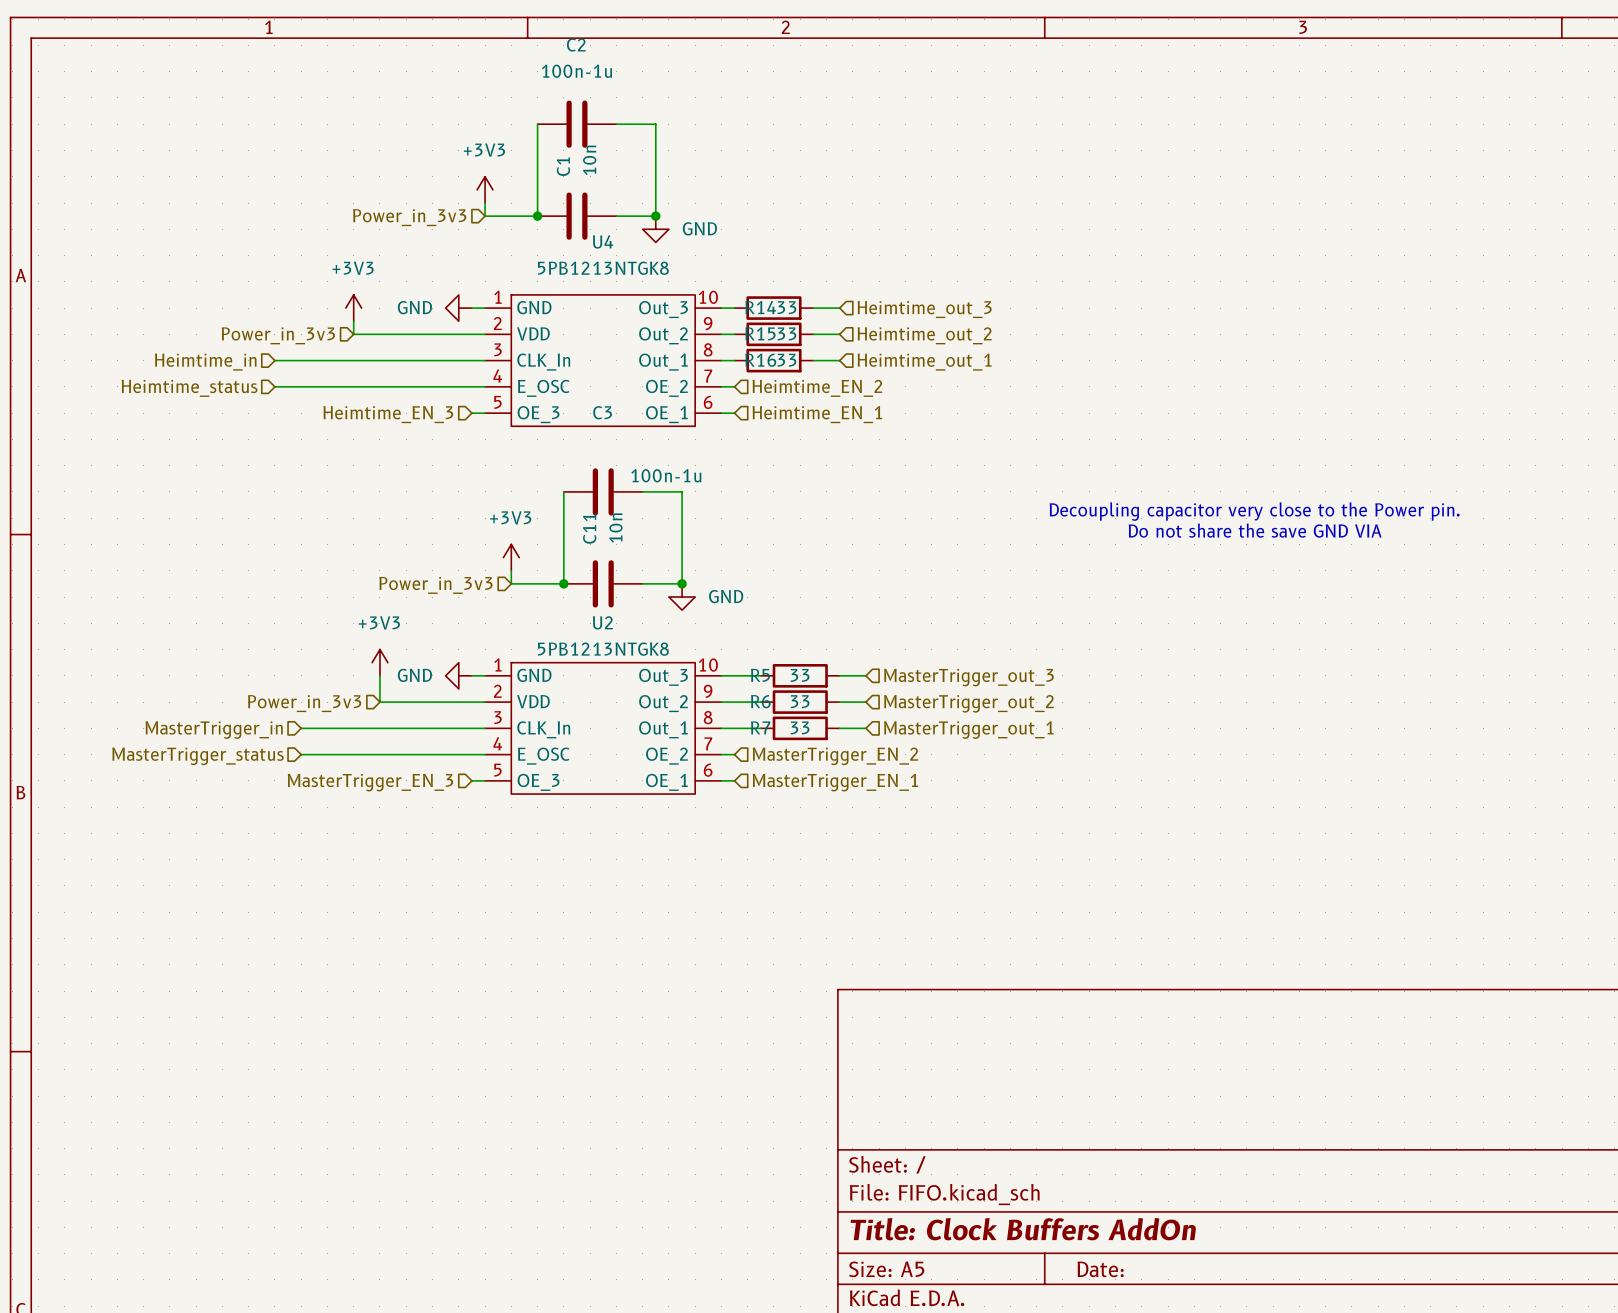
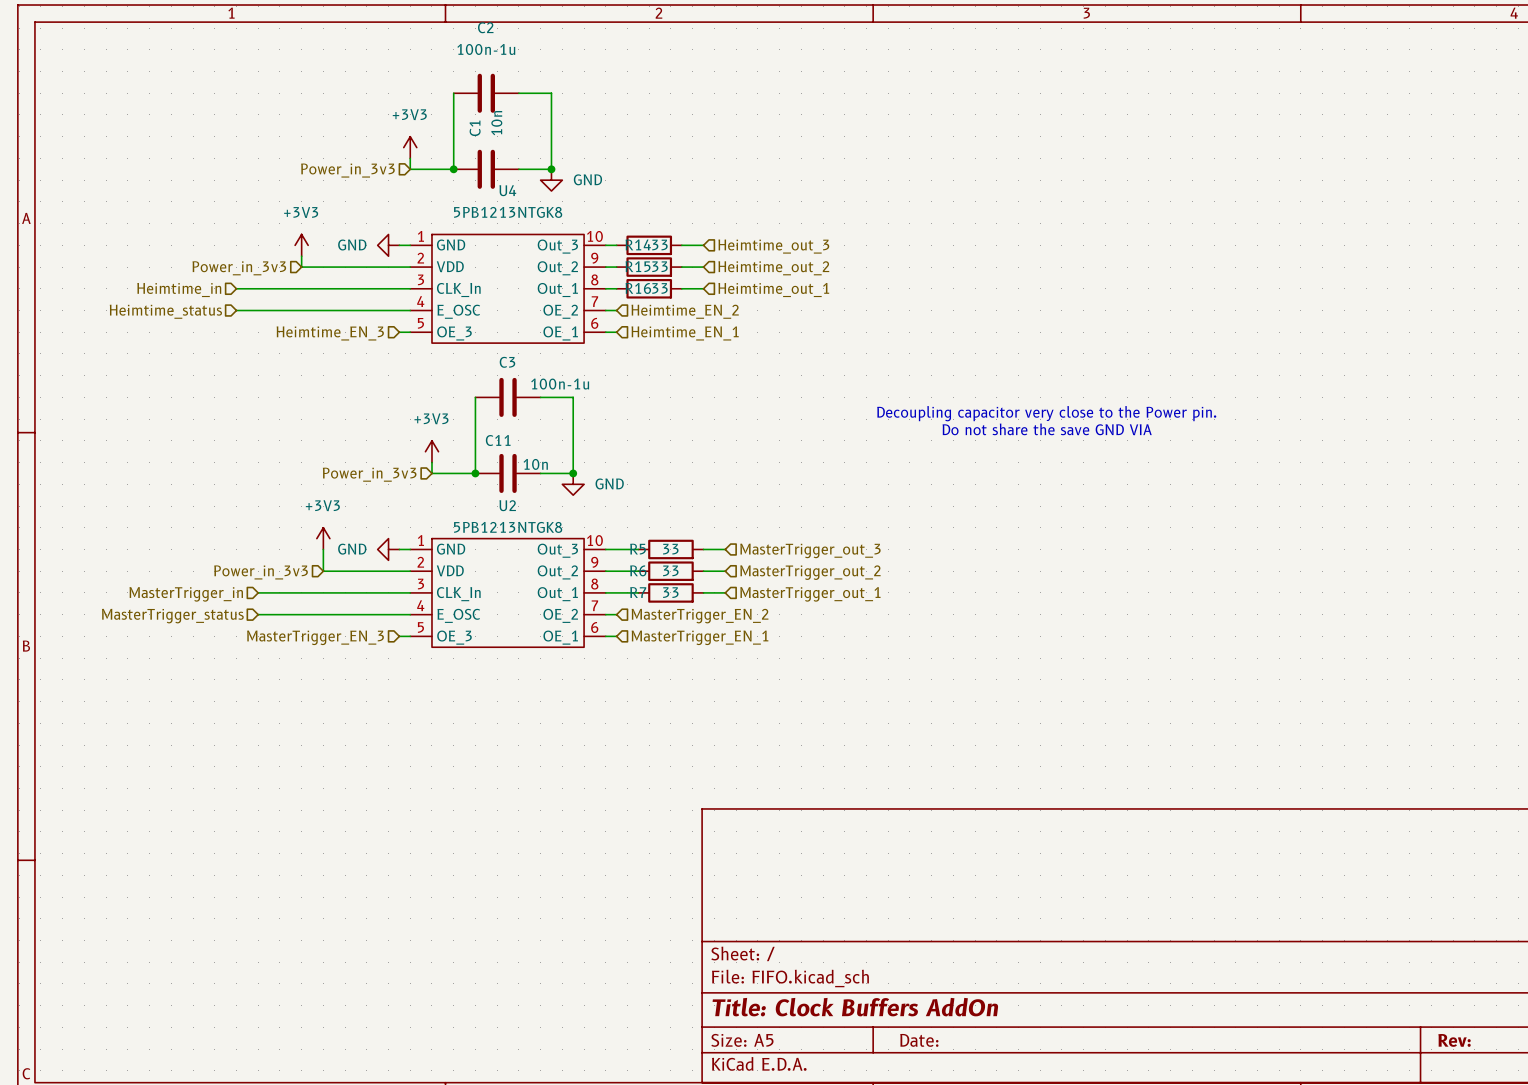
C3 name position: C3 (602, 412) -> C3 (507, 362)
C11 name rotation: 0° (589, 528) -> 90° clockwise (498, 440)
C11 value rotation: 0° (615, 528) -> 90° clockwise (535, 464)
C11 value position: 10n (615, 528) -> 10n (535, 464)

